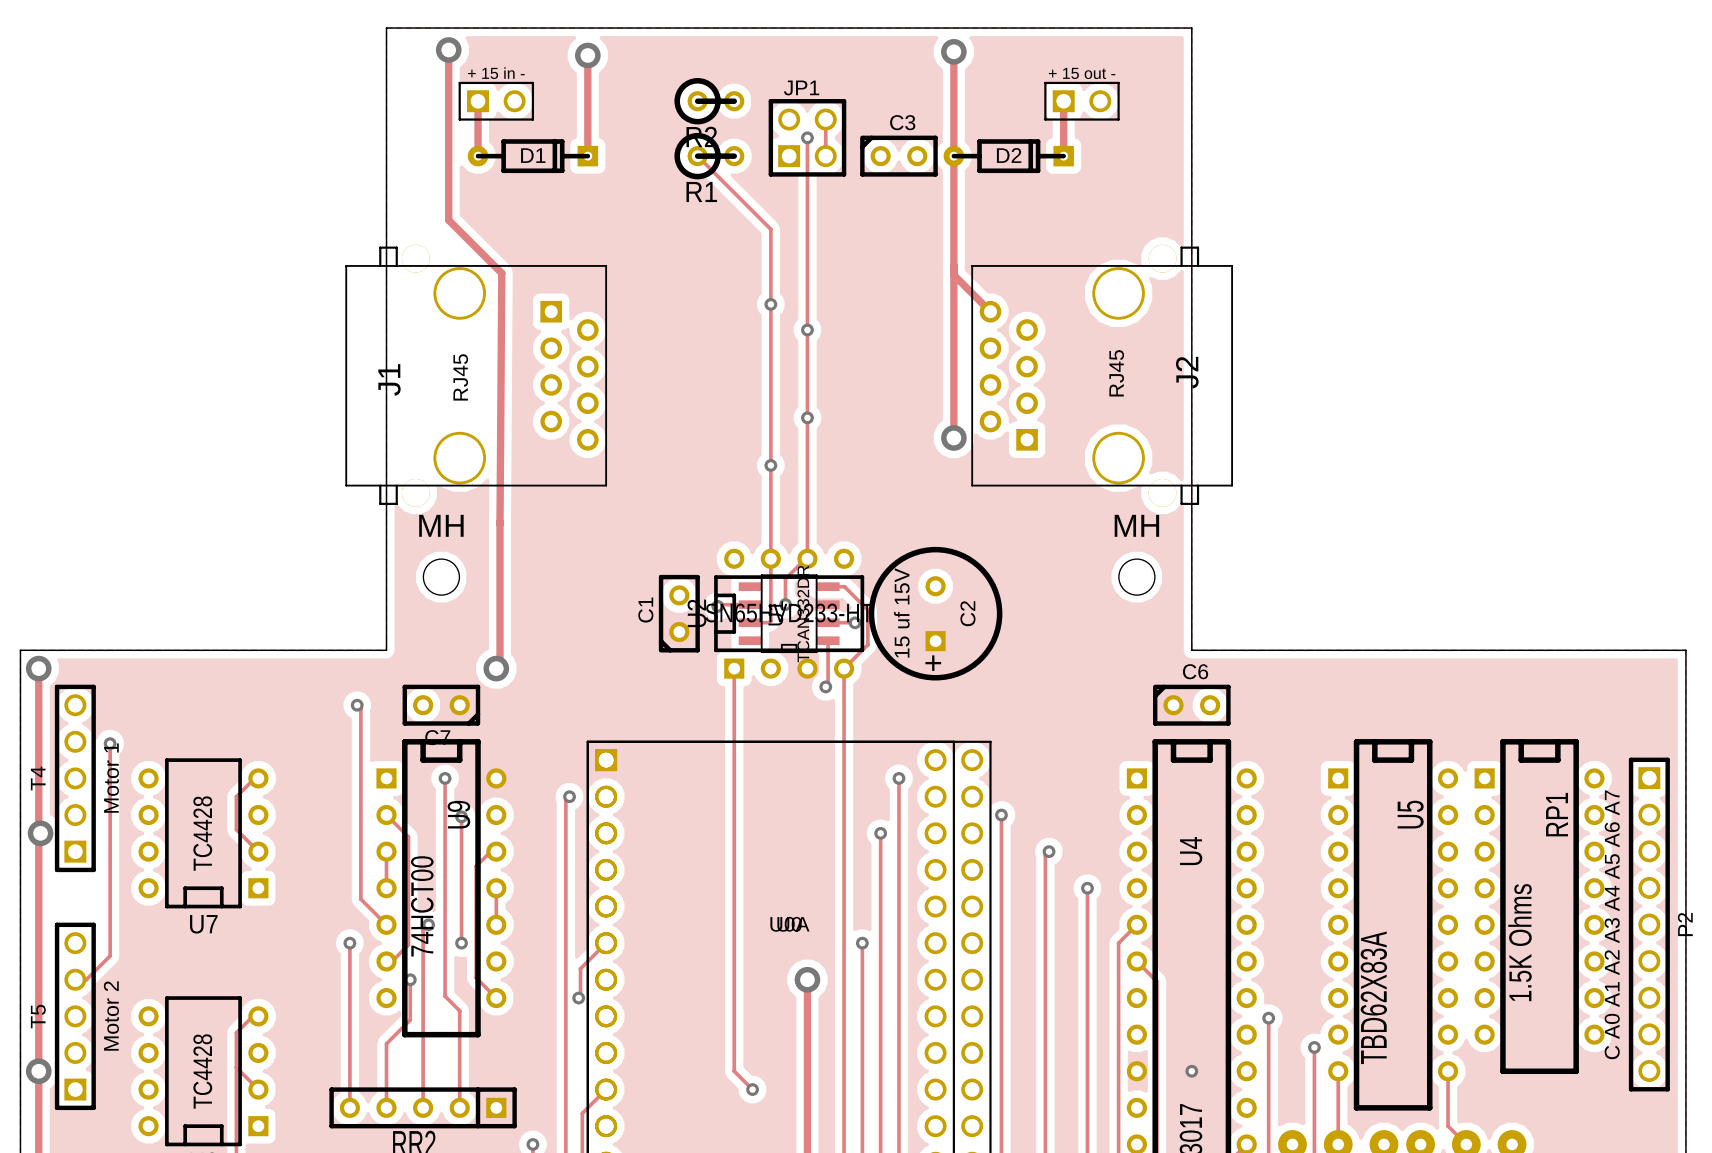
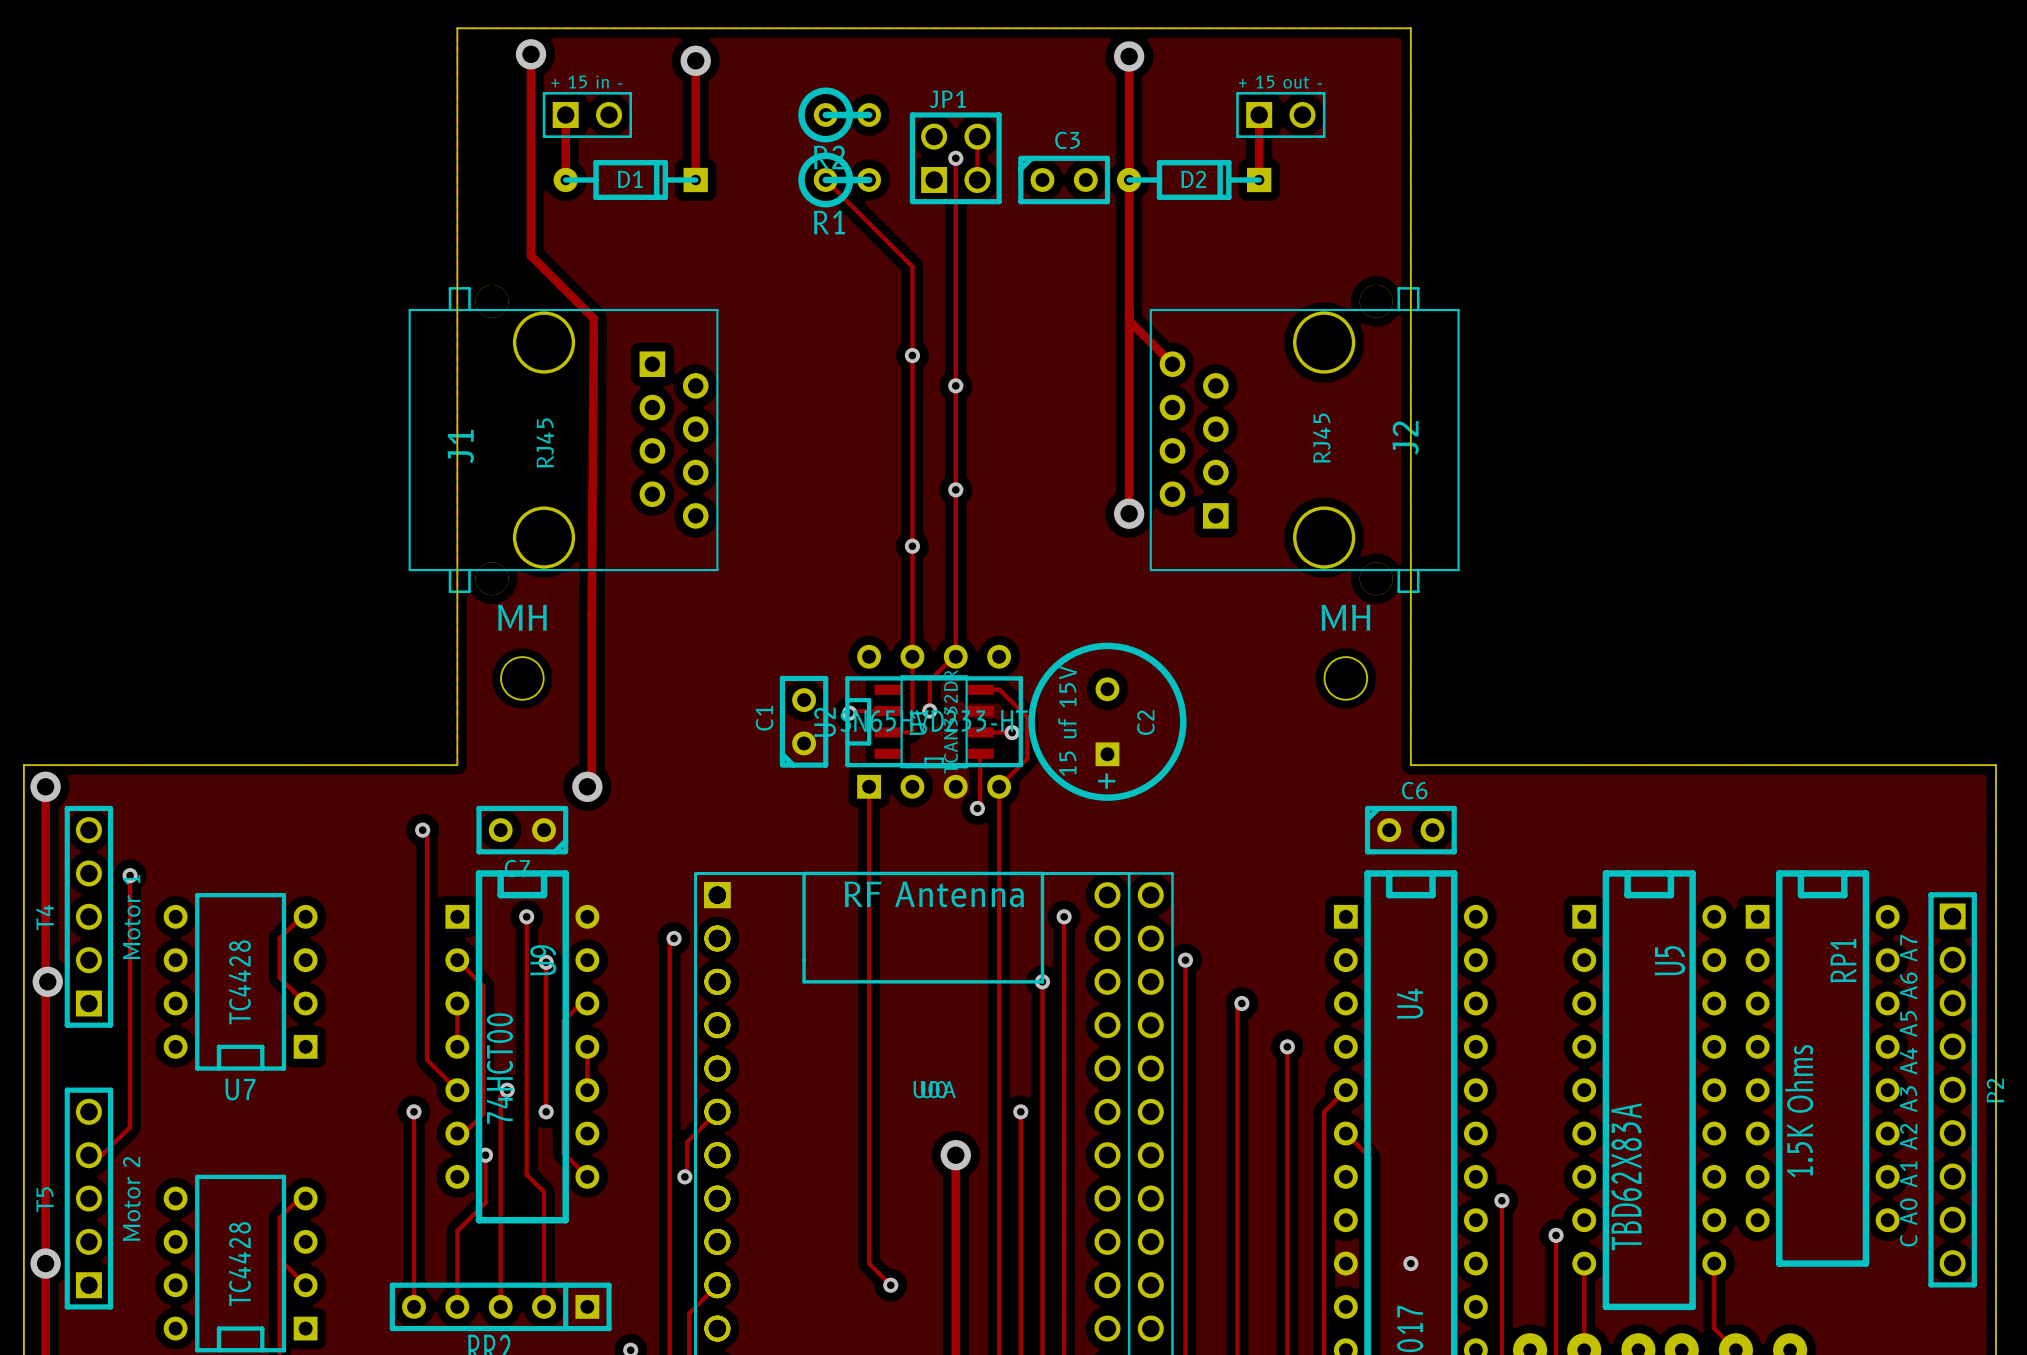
line: none -> (804, 873) (1042, 873) (1042, 981) (804, 981) (804, 873)
text: none -> RF Antenna (934, 894)

